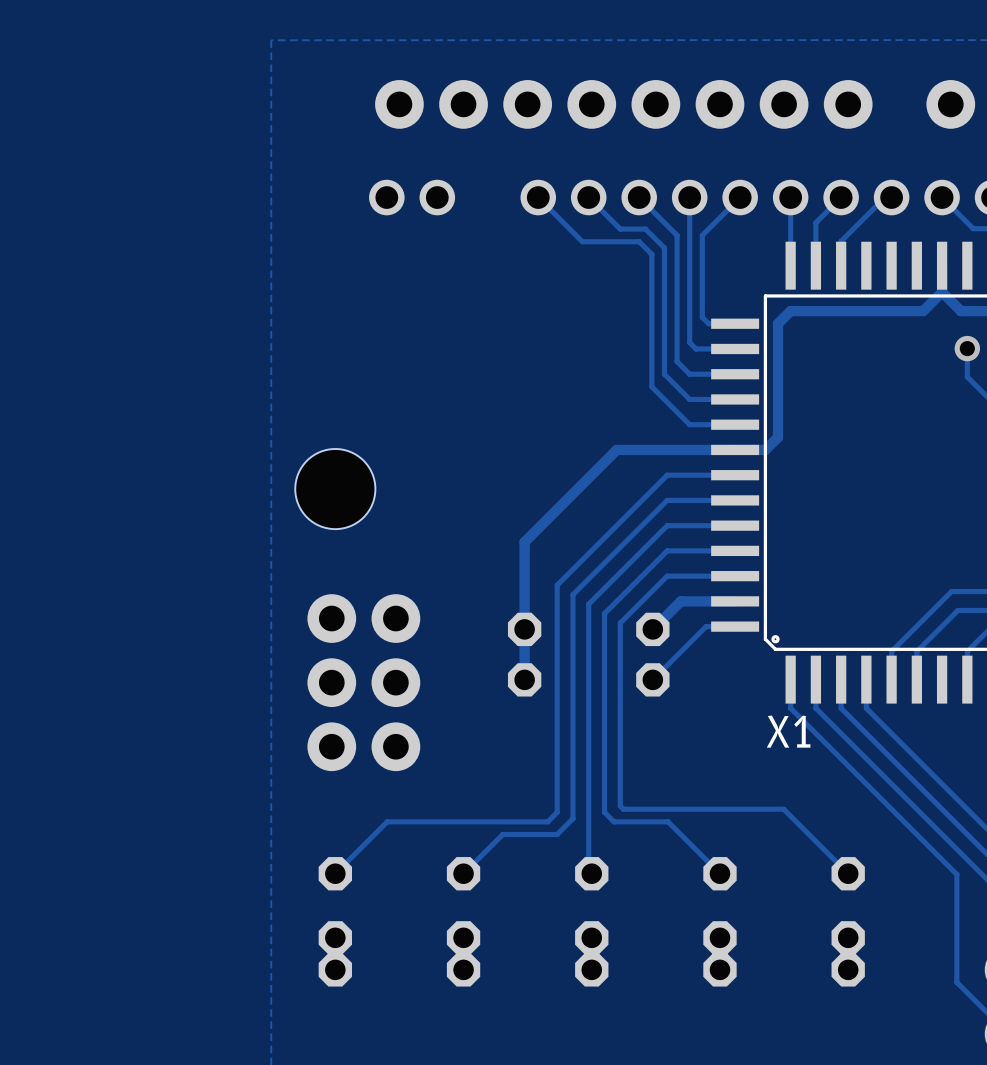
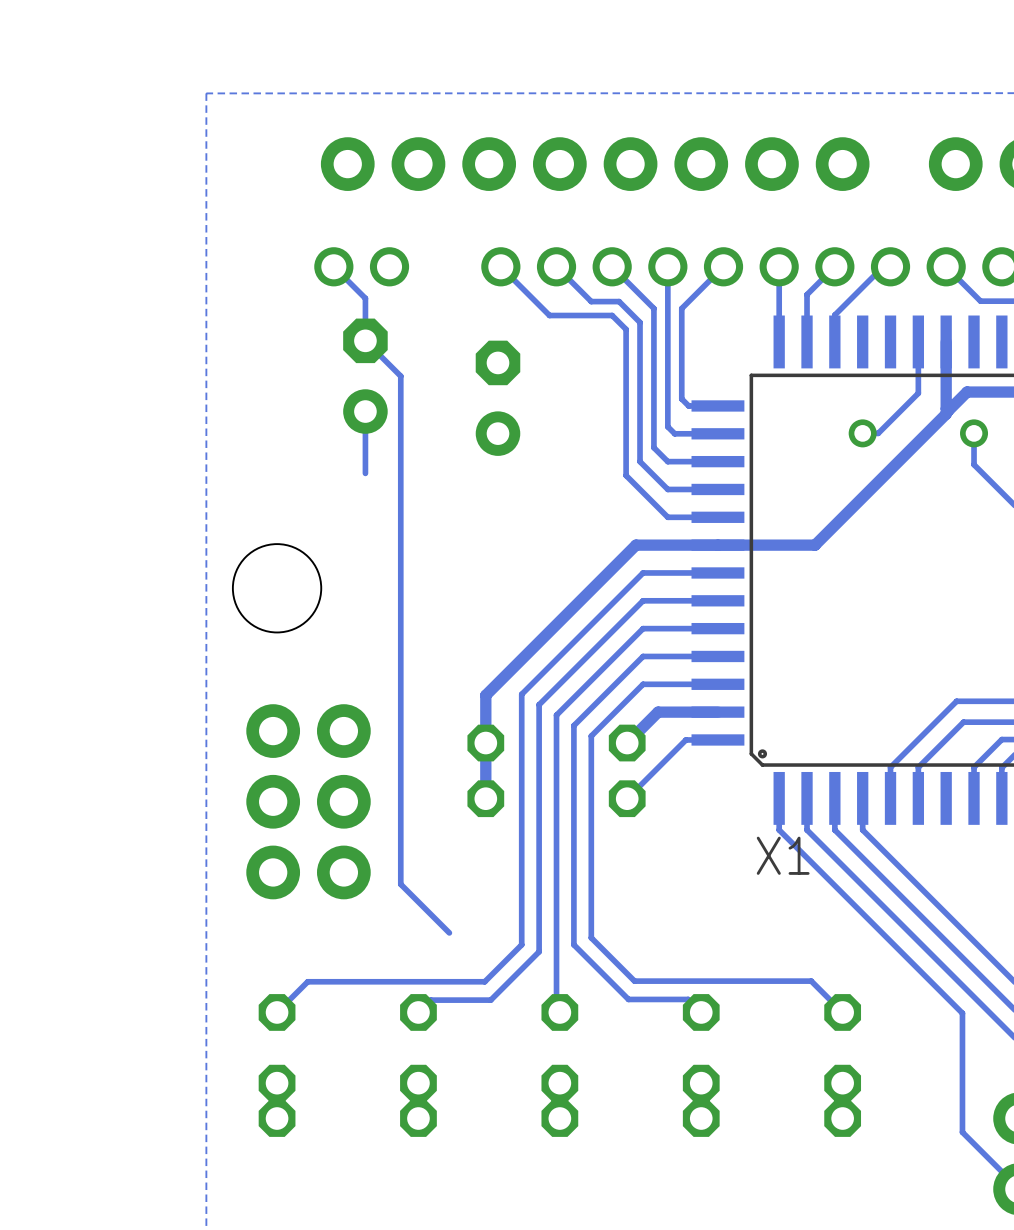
track: none -> (333, 266) (365, 298) (365, 340) (400, 376) (400, 884) (449, 932)
track: none -> (918, 341) (918, 393) (878, 433) (862, 433)
track: none -> (946, 371) (946, 409) (948, 410)
part: none -> (365, 376)
track: (961, 311) (942, 292) (923, 311) (790, 311) (778, 323) (778, 437) (765, 449) -> (967, 392) (815, 545) (751, 545)
part: none -> (497, 398)
track: none -> (365, 411) (365, 473)
via: none -> (862, 433)
track: (660, 449) (616, 449) (524, 542) (524, 586) -> (636, 545) (485, 695)
track: (623, 809) (783, 809) (819, 845) -> (594, 941) (634, 981) (811, 981)
track: (547, 821) (387, 821) (363, 845) -> (511, 955) (484, 981) (307, 981)
track: (613, 821) (668, 821) (708, 861) -> (584, 955) (628, 999) (688, 999)
track: (557, 834) (502, 834) (474, 862) -> (521, 969) (490, 1000) (430, 1000)

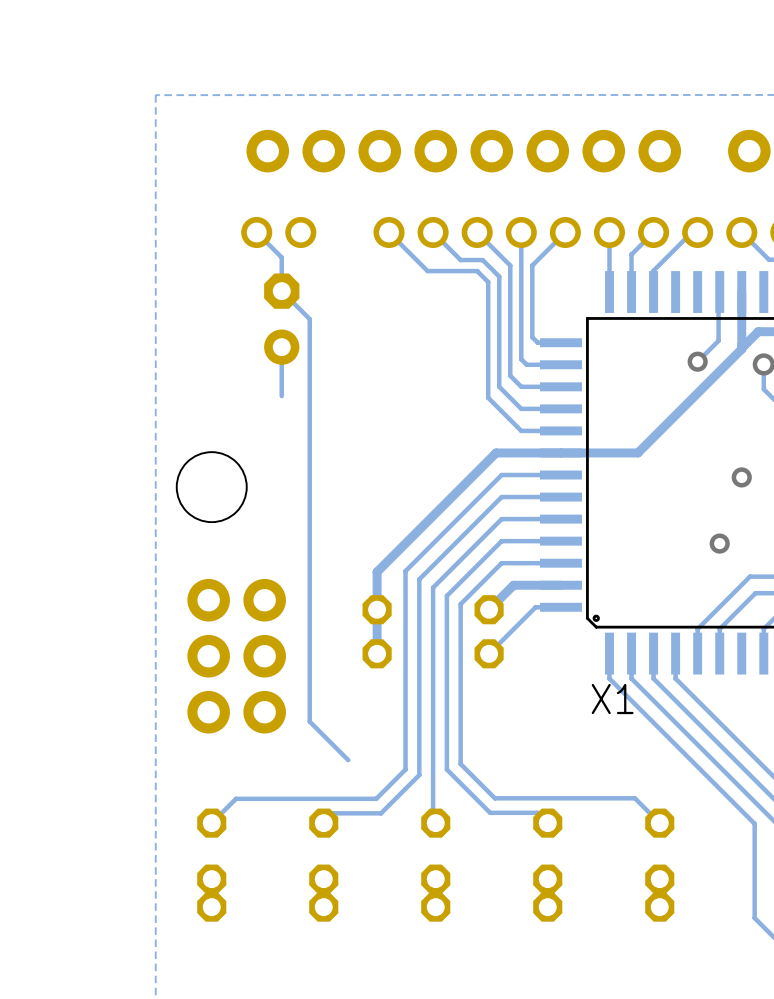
track: (918, 341) (918, 393) (878, 433) (862, 433) -> (719, 292) (718, 340) (697, 361)
part: (497, 398) -> none
via: none -> (697, 361)
via: (862, 433) -> none
via: none -> (741, 477)
via: none -> (719, 543)

